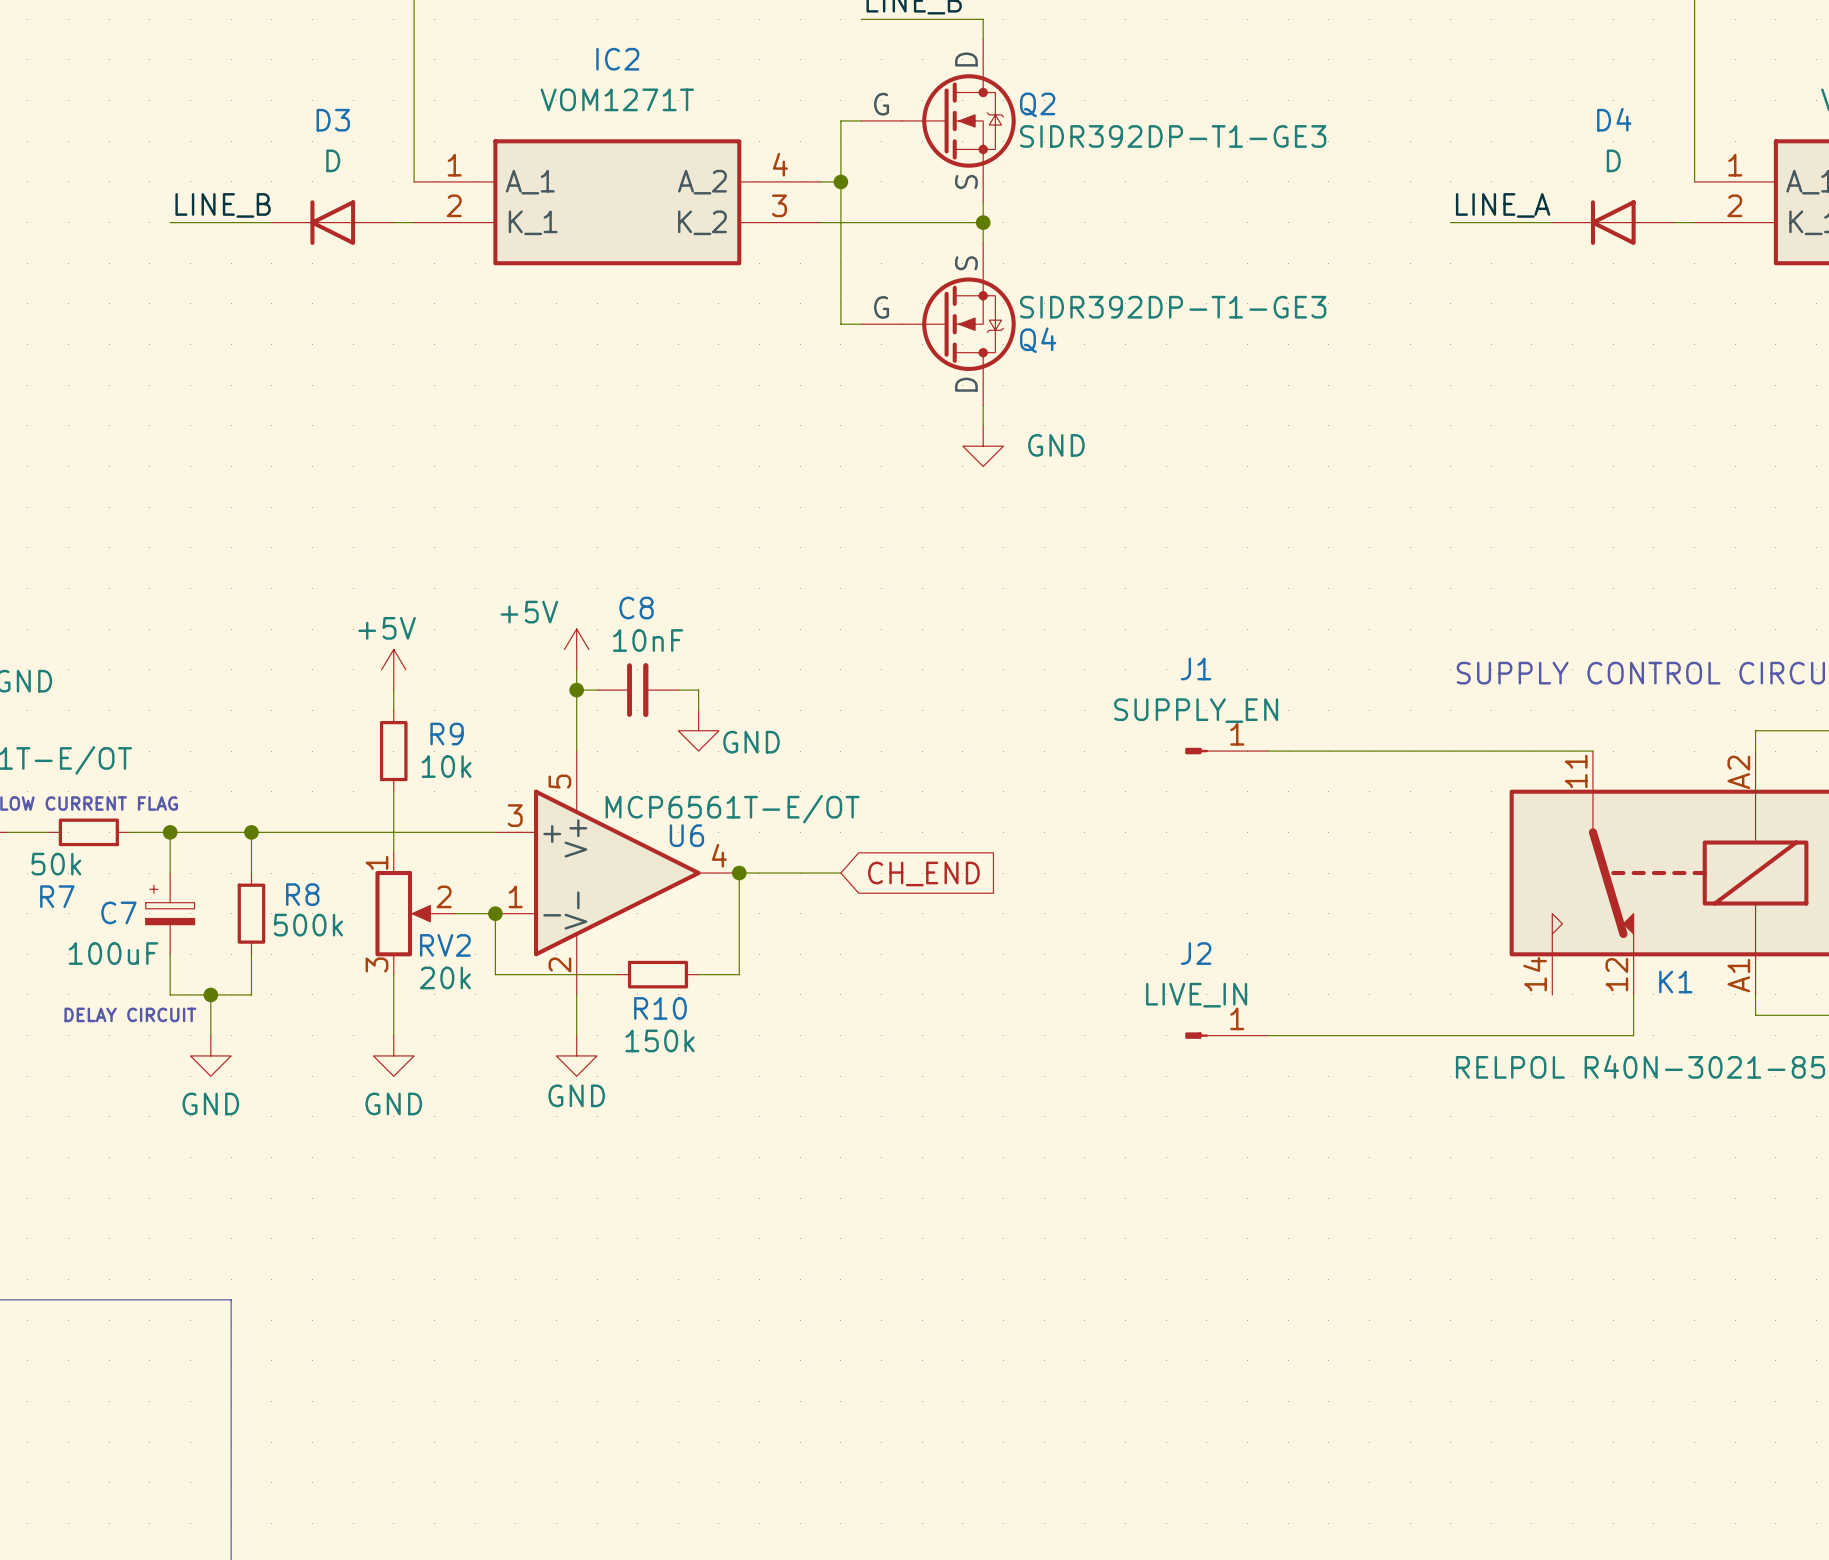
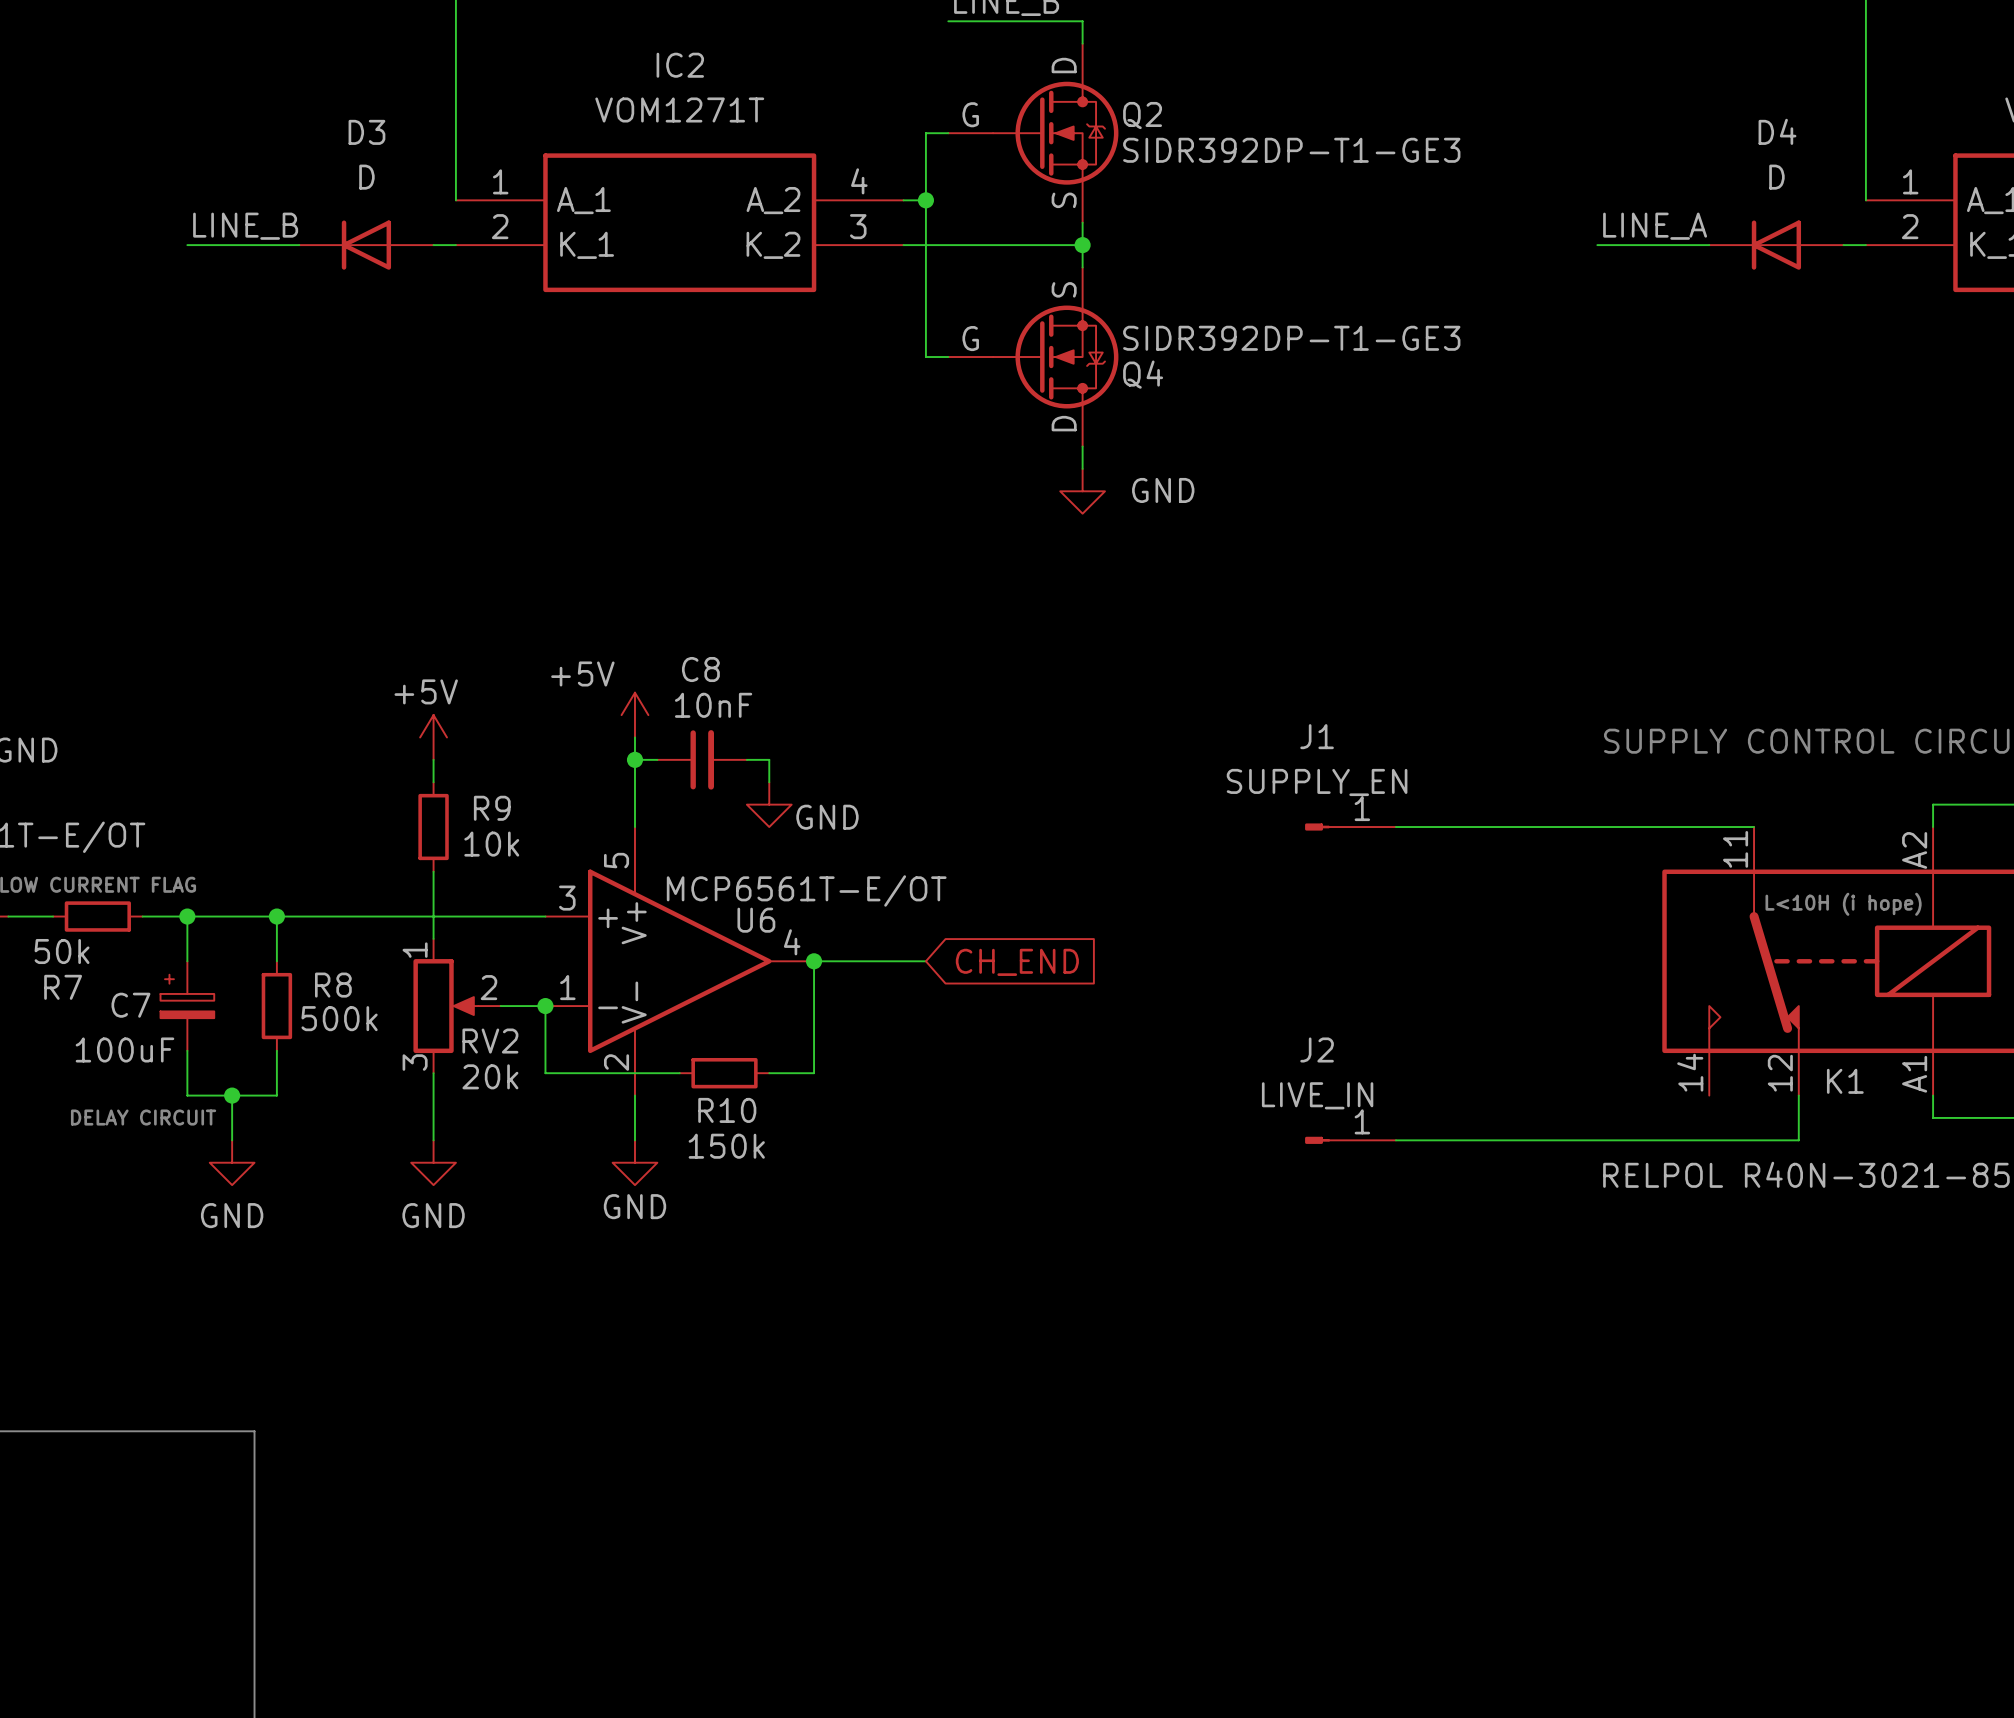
text: none -> L<10H (i hope) (1843, 904)

